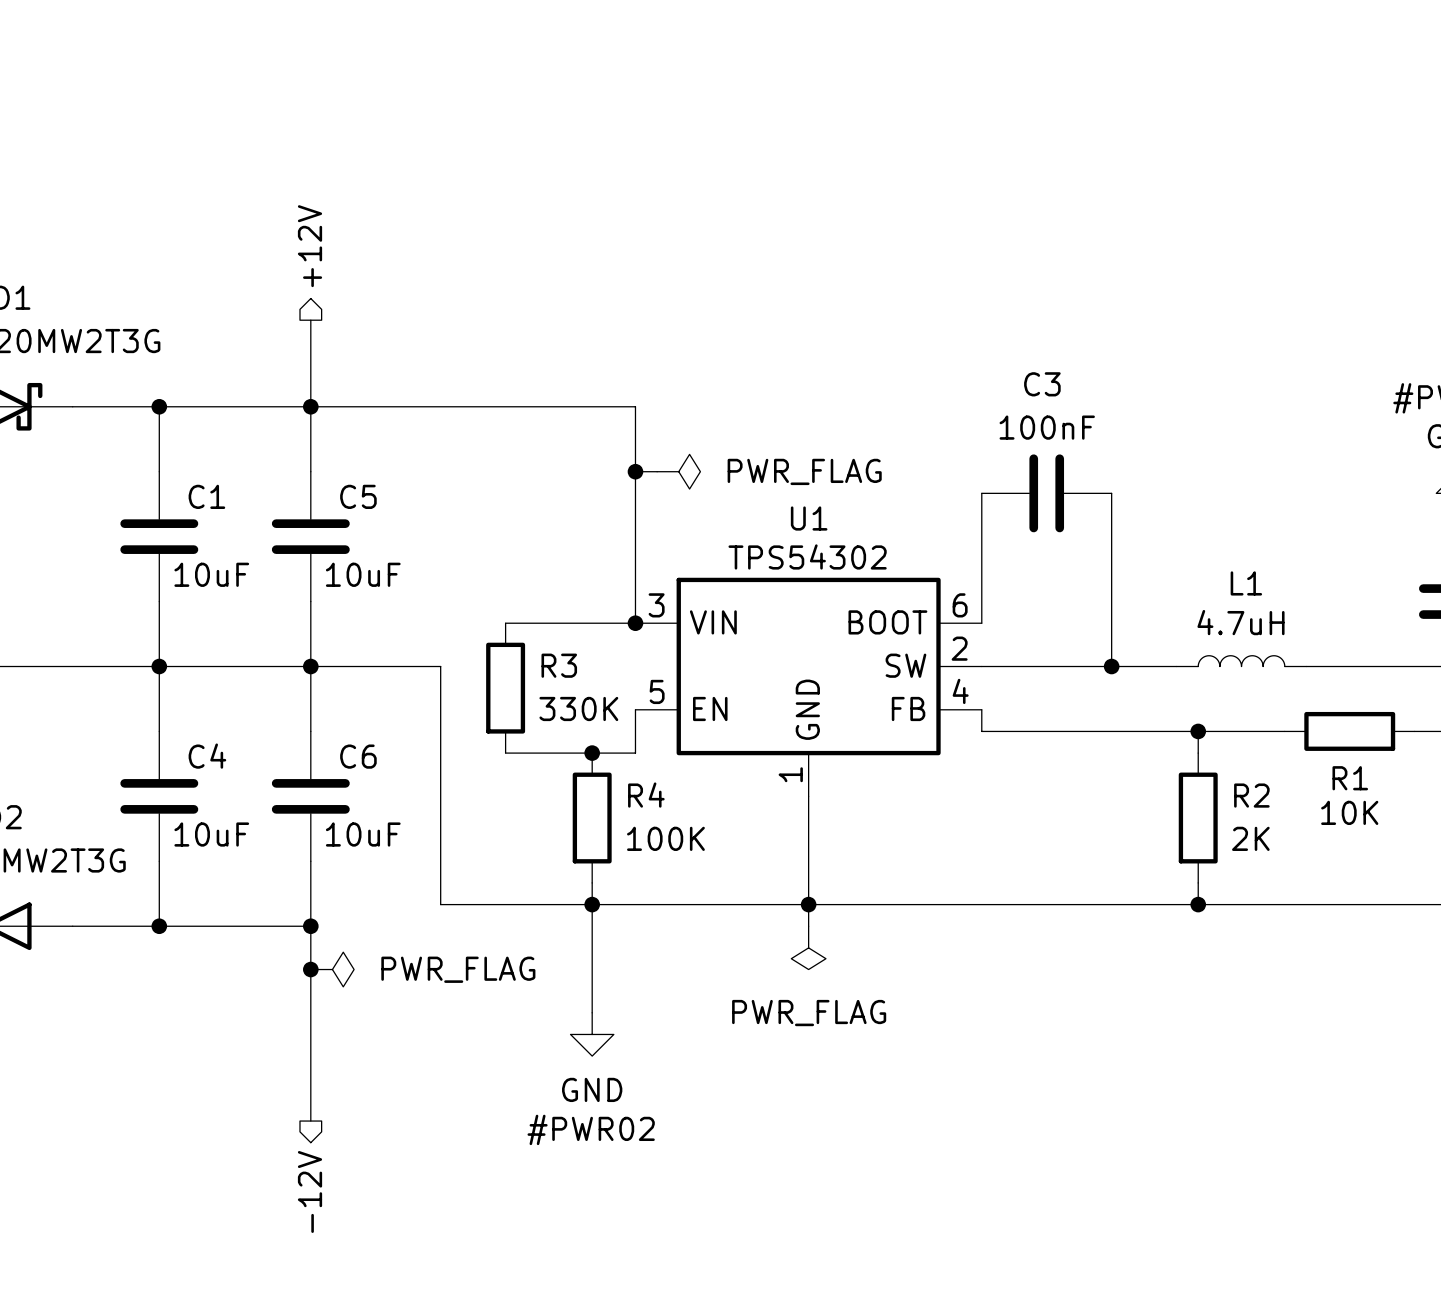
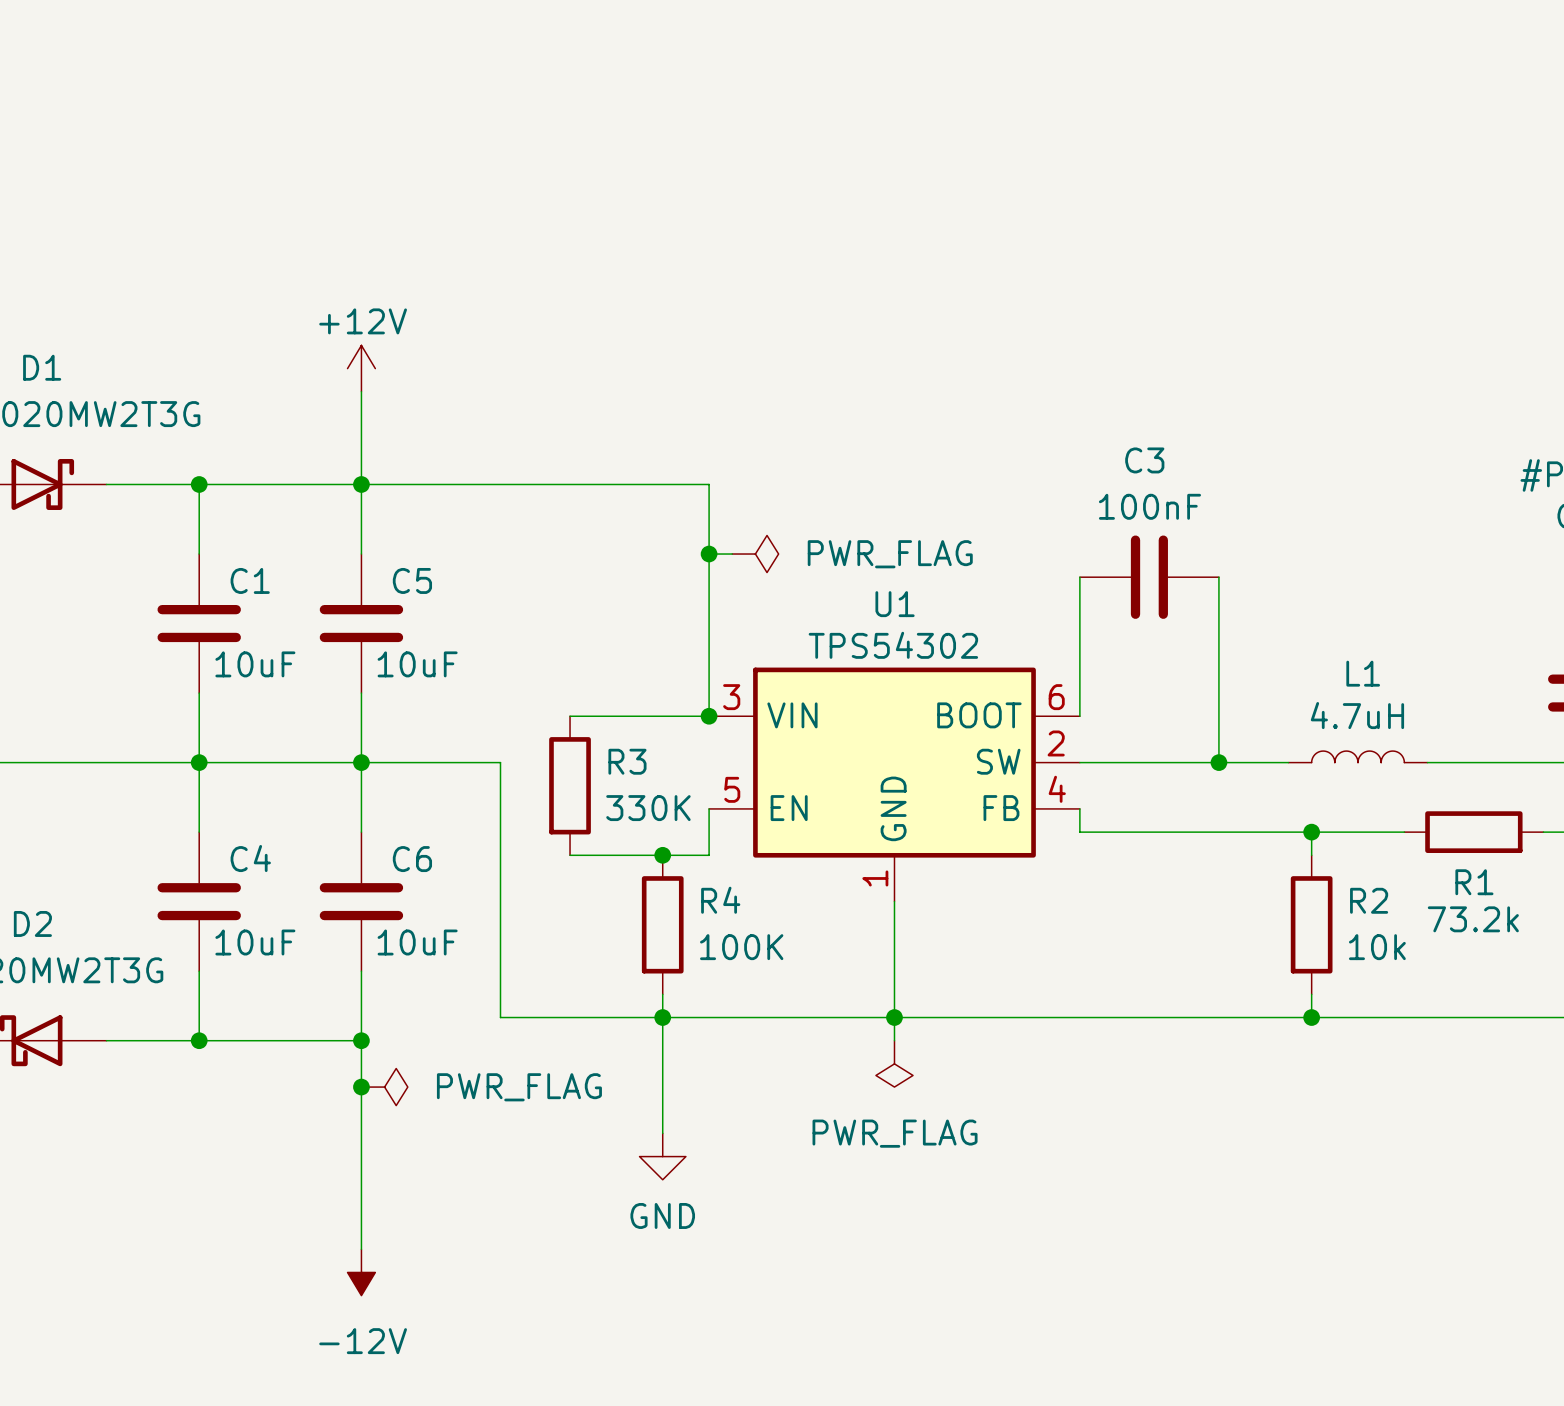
hierarchical label: +12V (310, 246) -> none
power symbol: none -> +12V (361, 368)
R1 value: 10K (1349, 812) -> 73.2k (1473, 919)
R2 value: 2K (1250, 838) -> 10k (1377, 947)
#PWR02 name: #PWR02 (591, 1129) -> none
power symbol: none -> -12V (361, 1272)
hierarchical label: -12V (310, 1191) -> none

